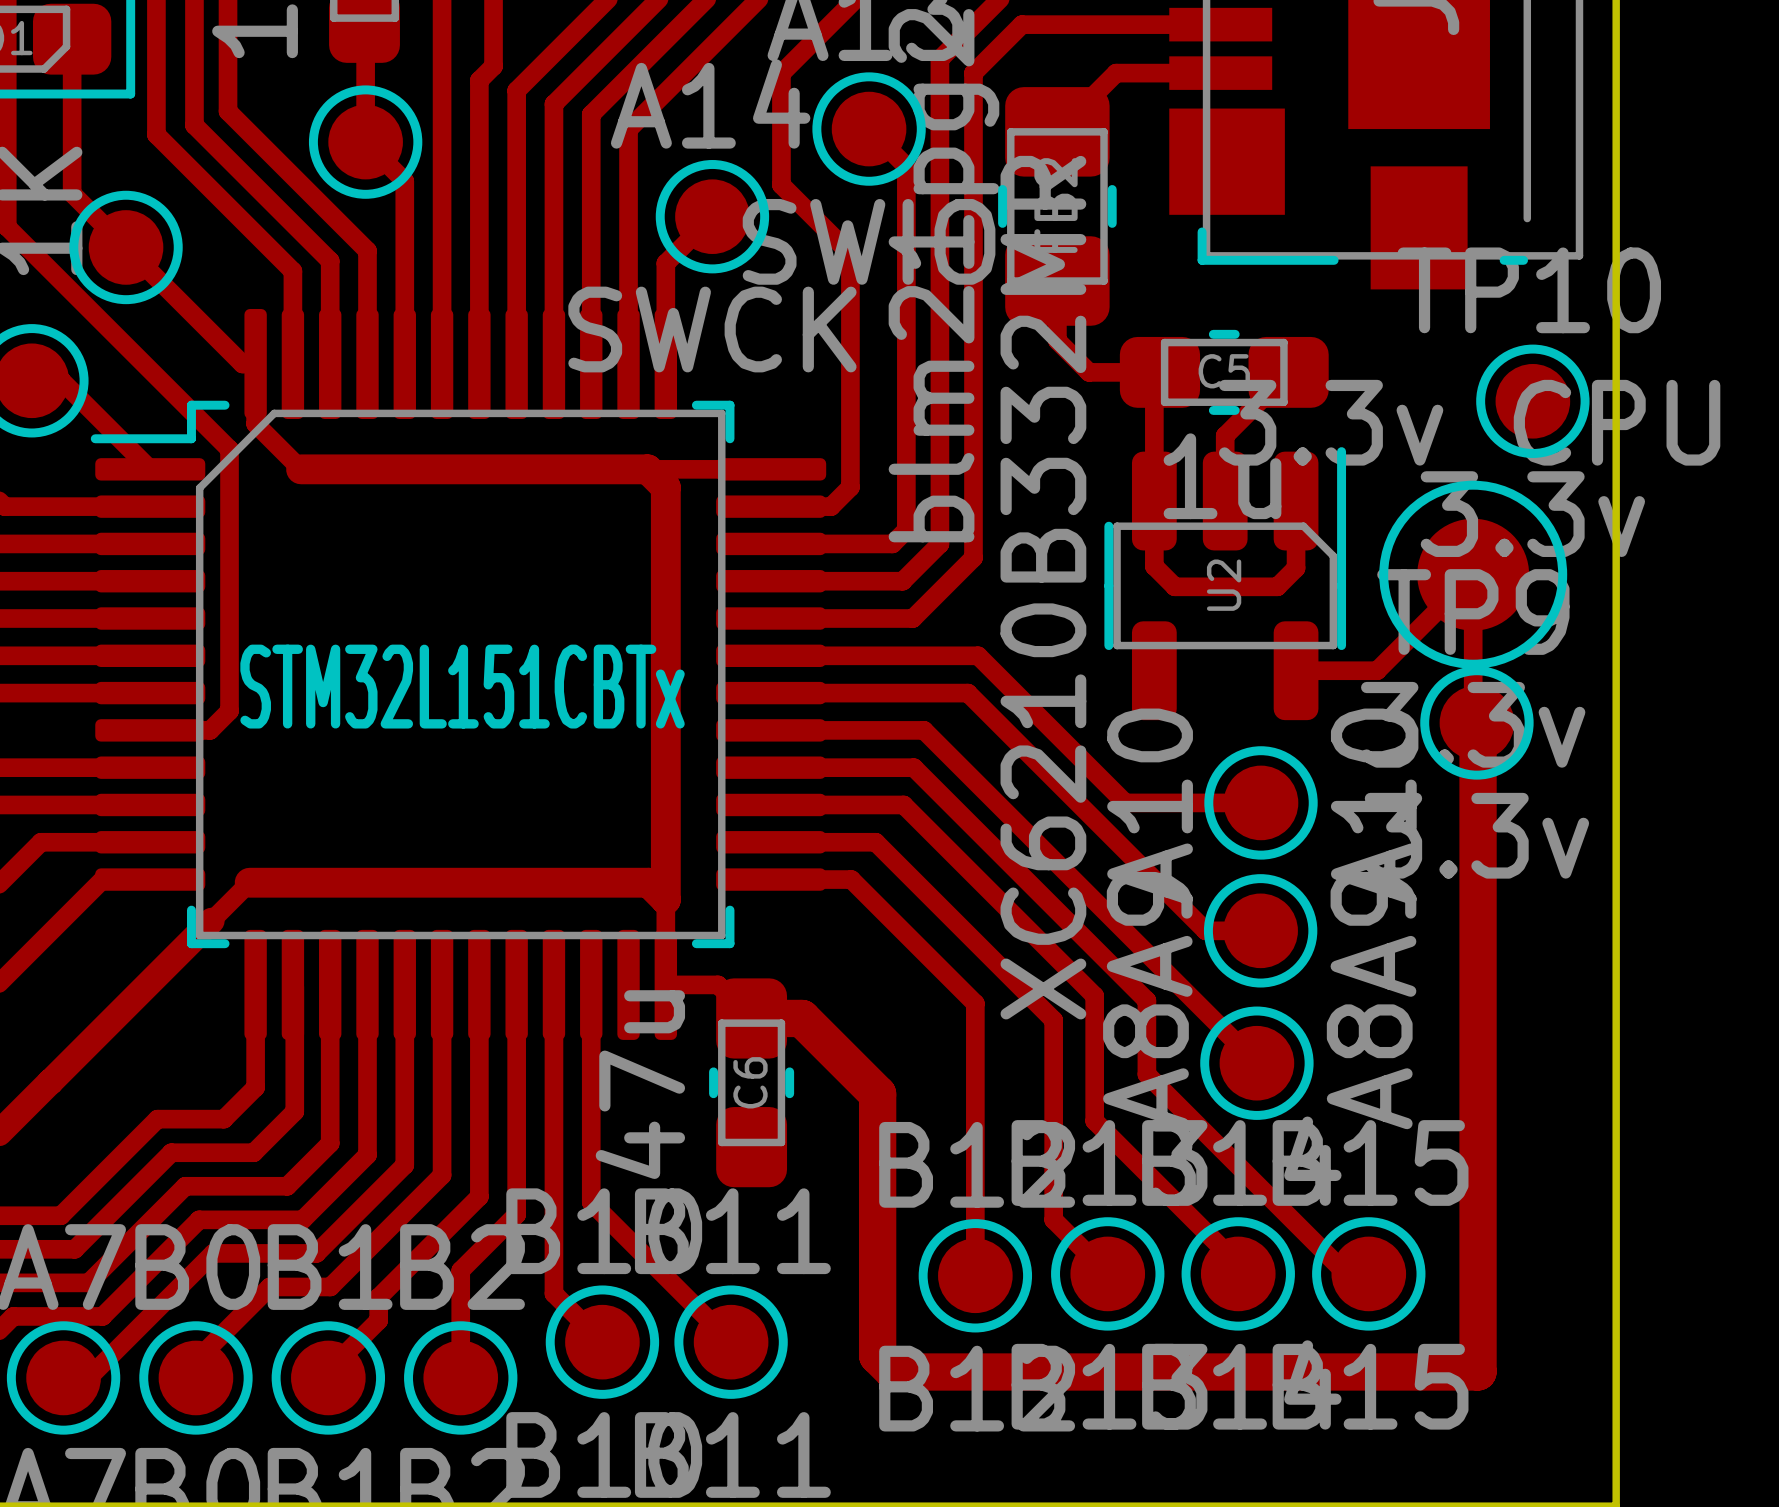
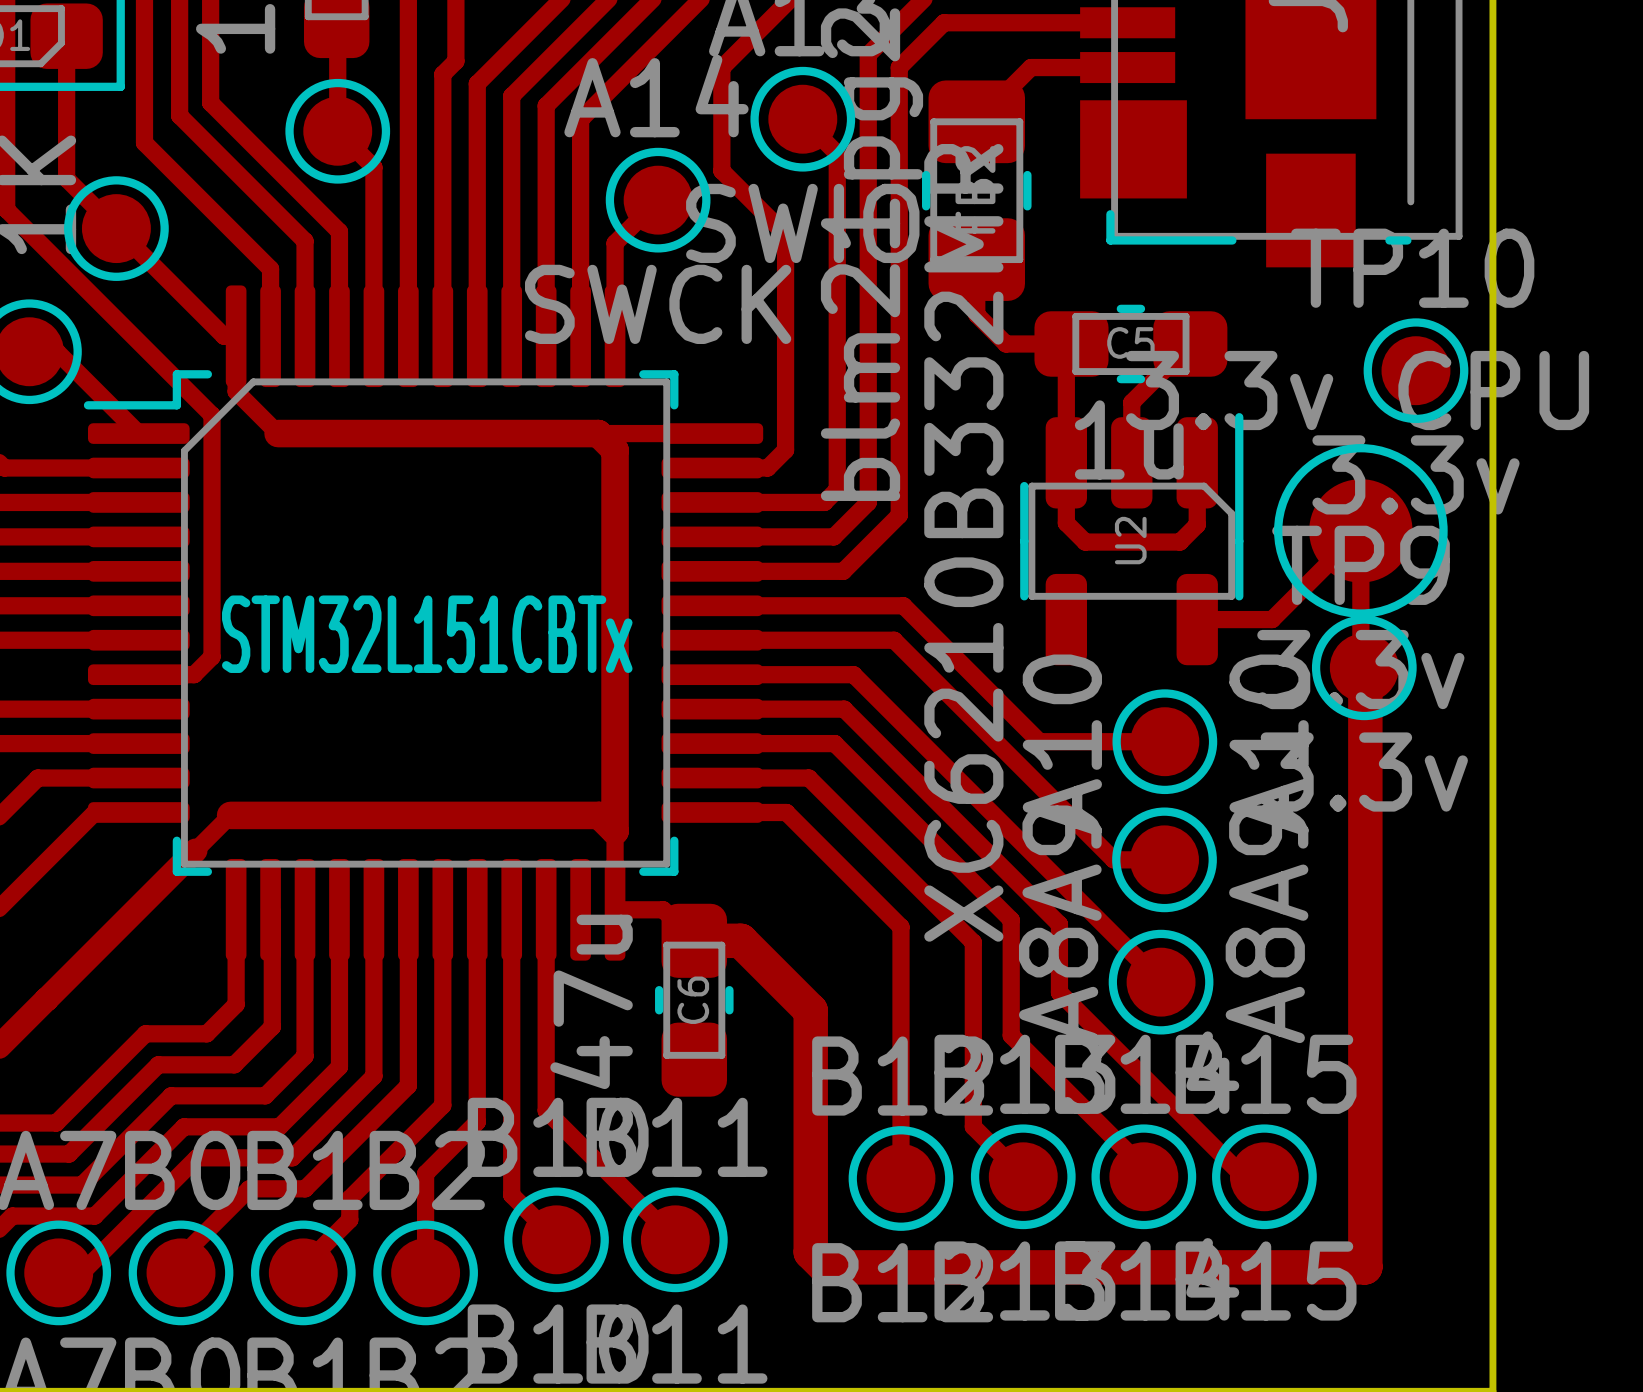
top track: (156, 134) (292, 271) (292, 291) -> (144, 124) (144, 142) (270, 268)

